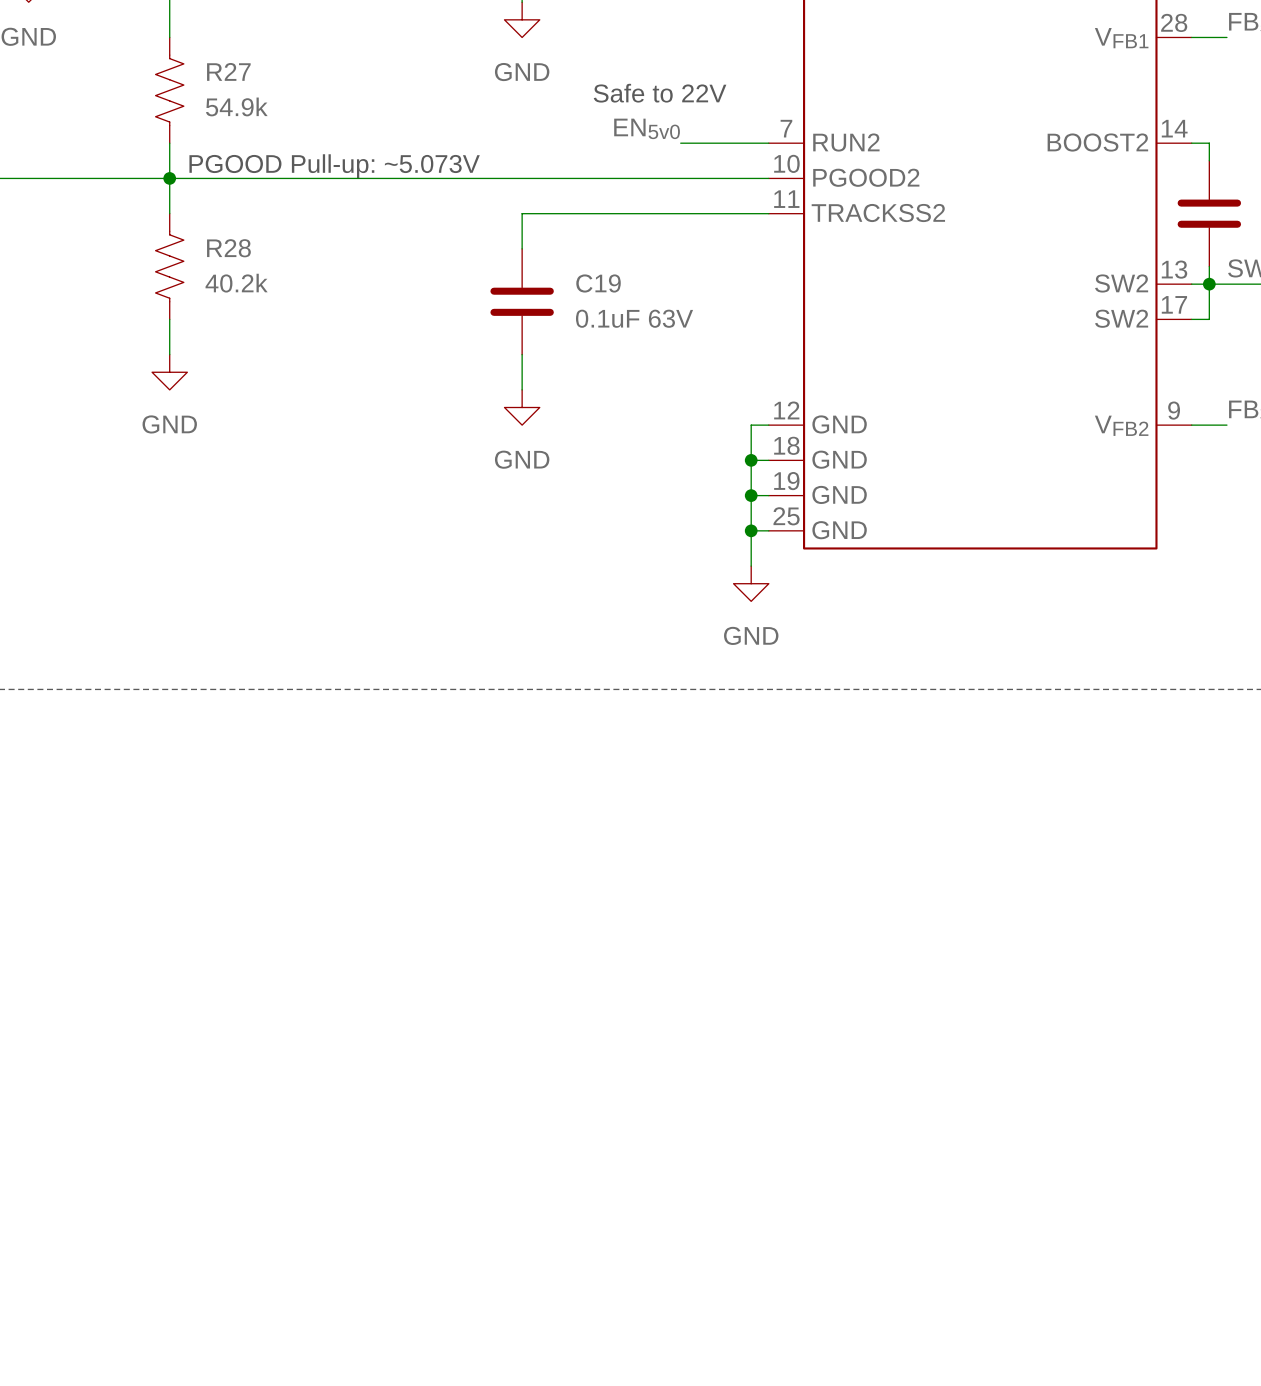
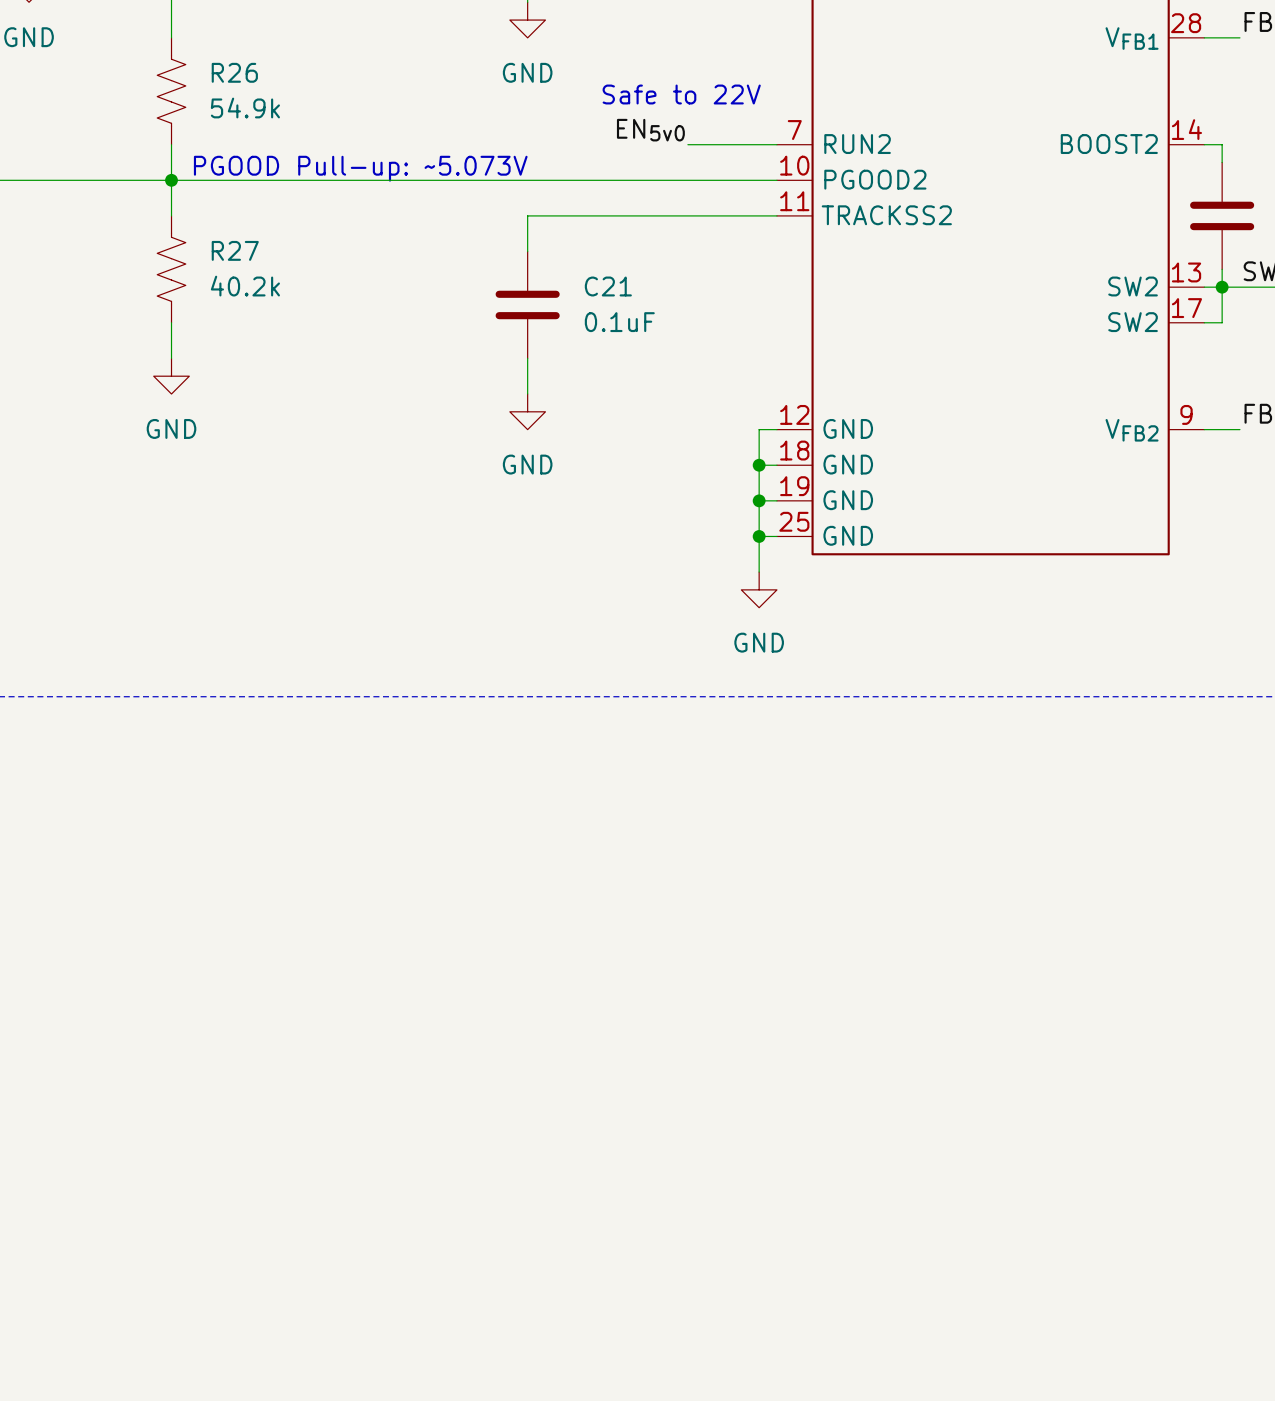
R27 name: R27 (228, 71) -> R26 (234, 72)
R28 name: R28 (228, 248) -> R27 (235, 250)
C19 name: C19 (598, 283) -> C21 (608, 286)
C19 value: 0.1uF 63V (634, 318) -> 0.1uF (619, 322)

